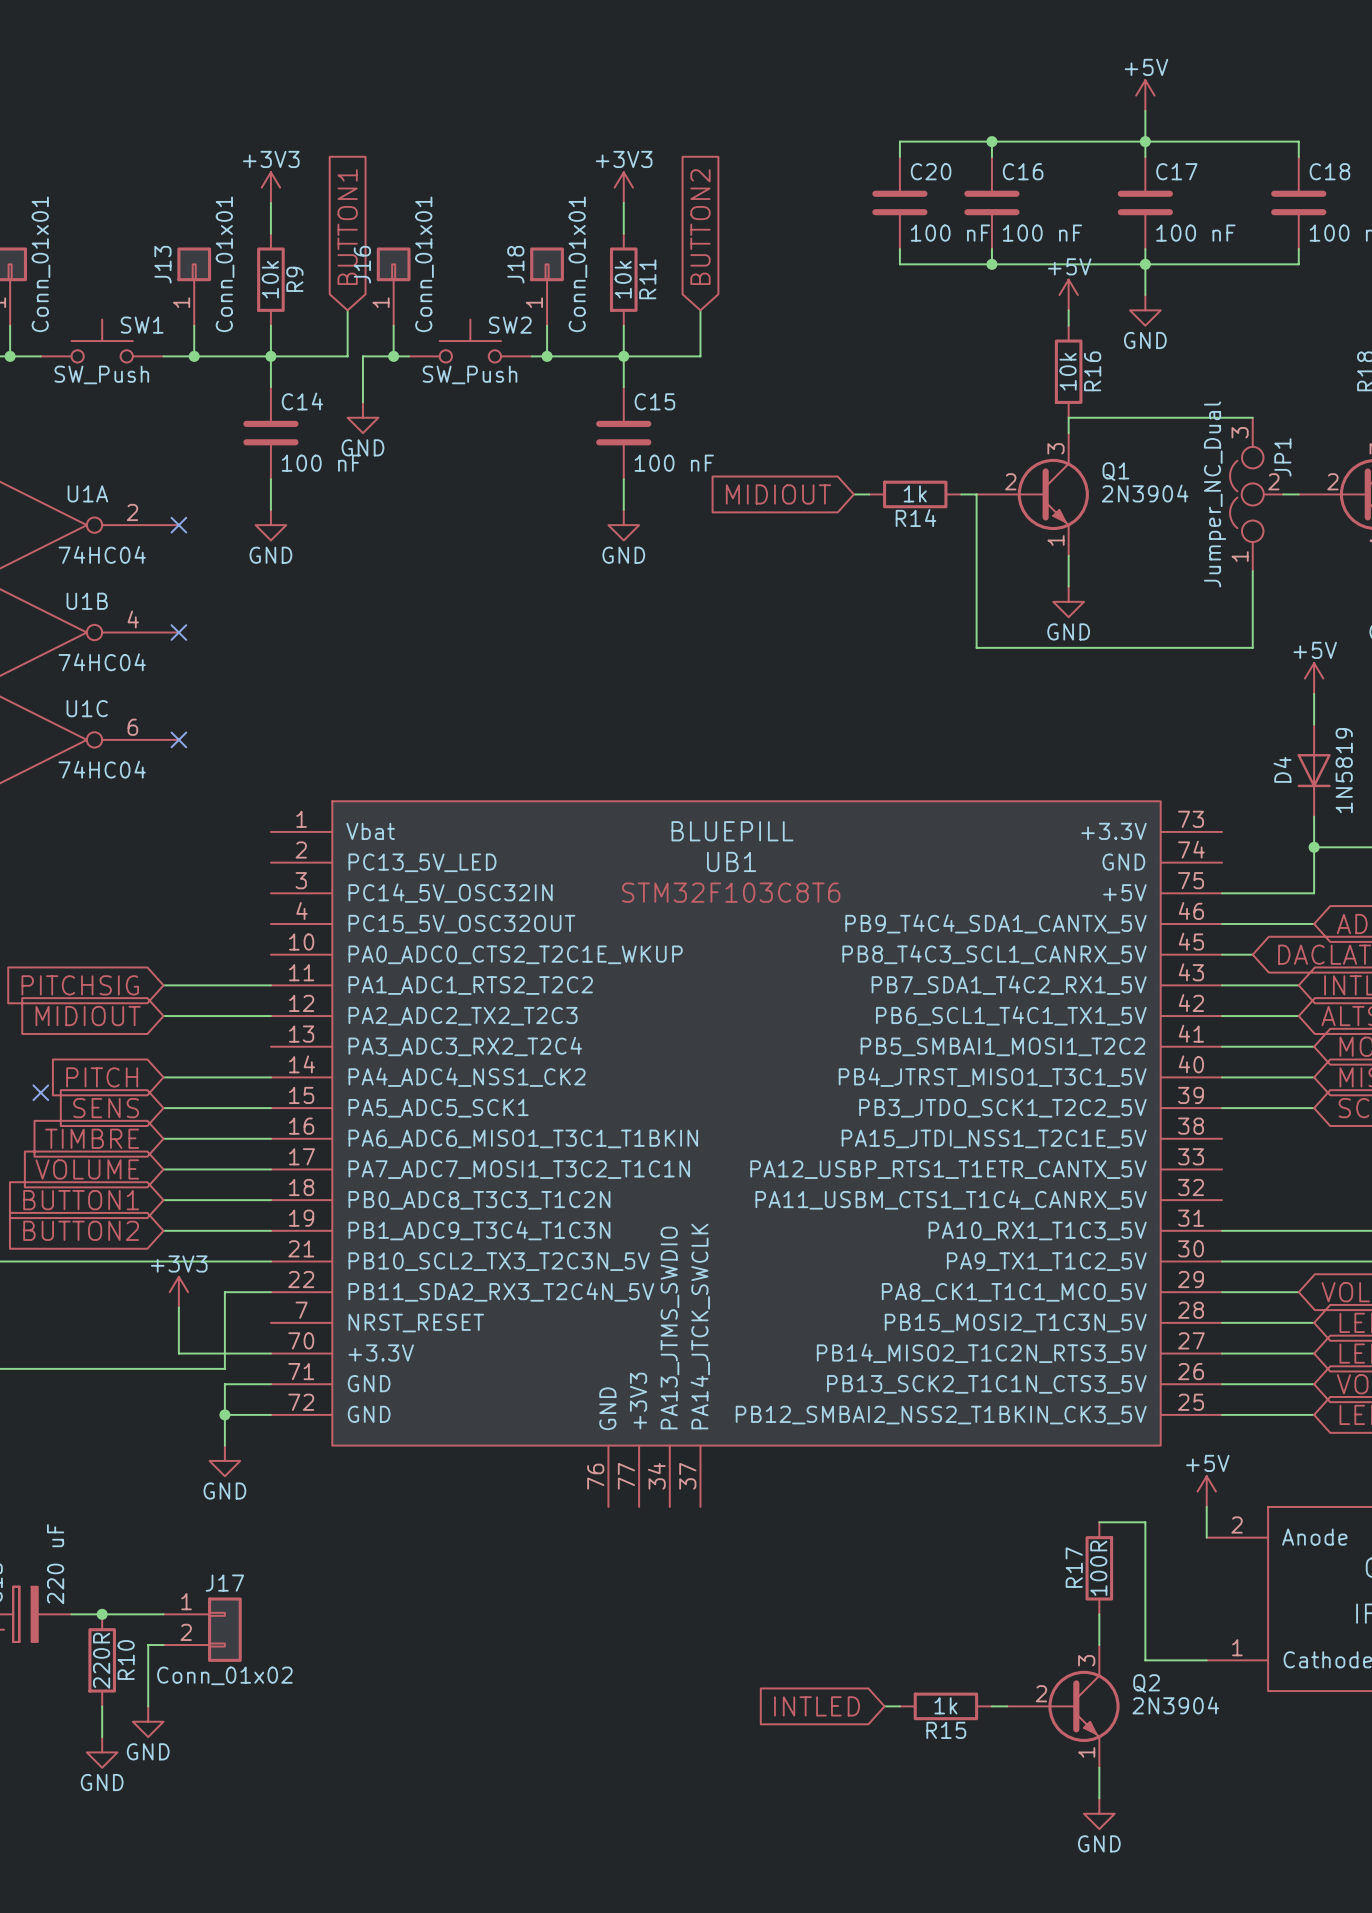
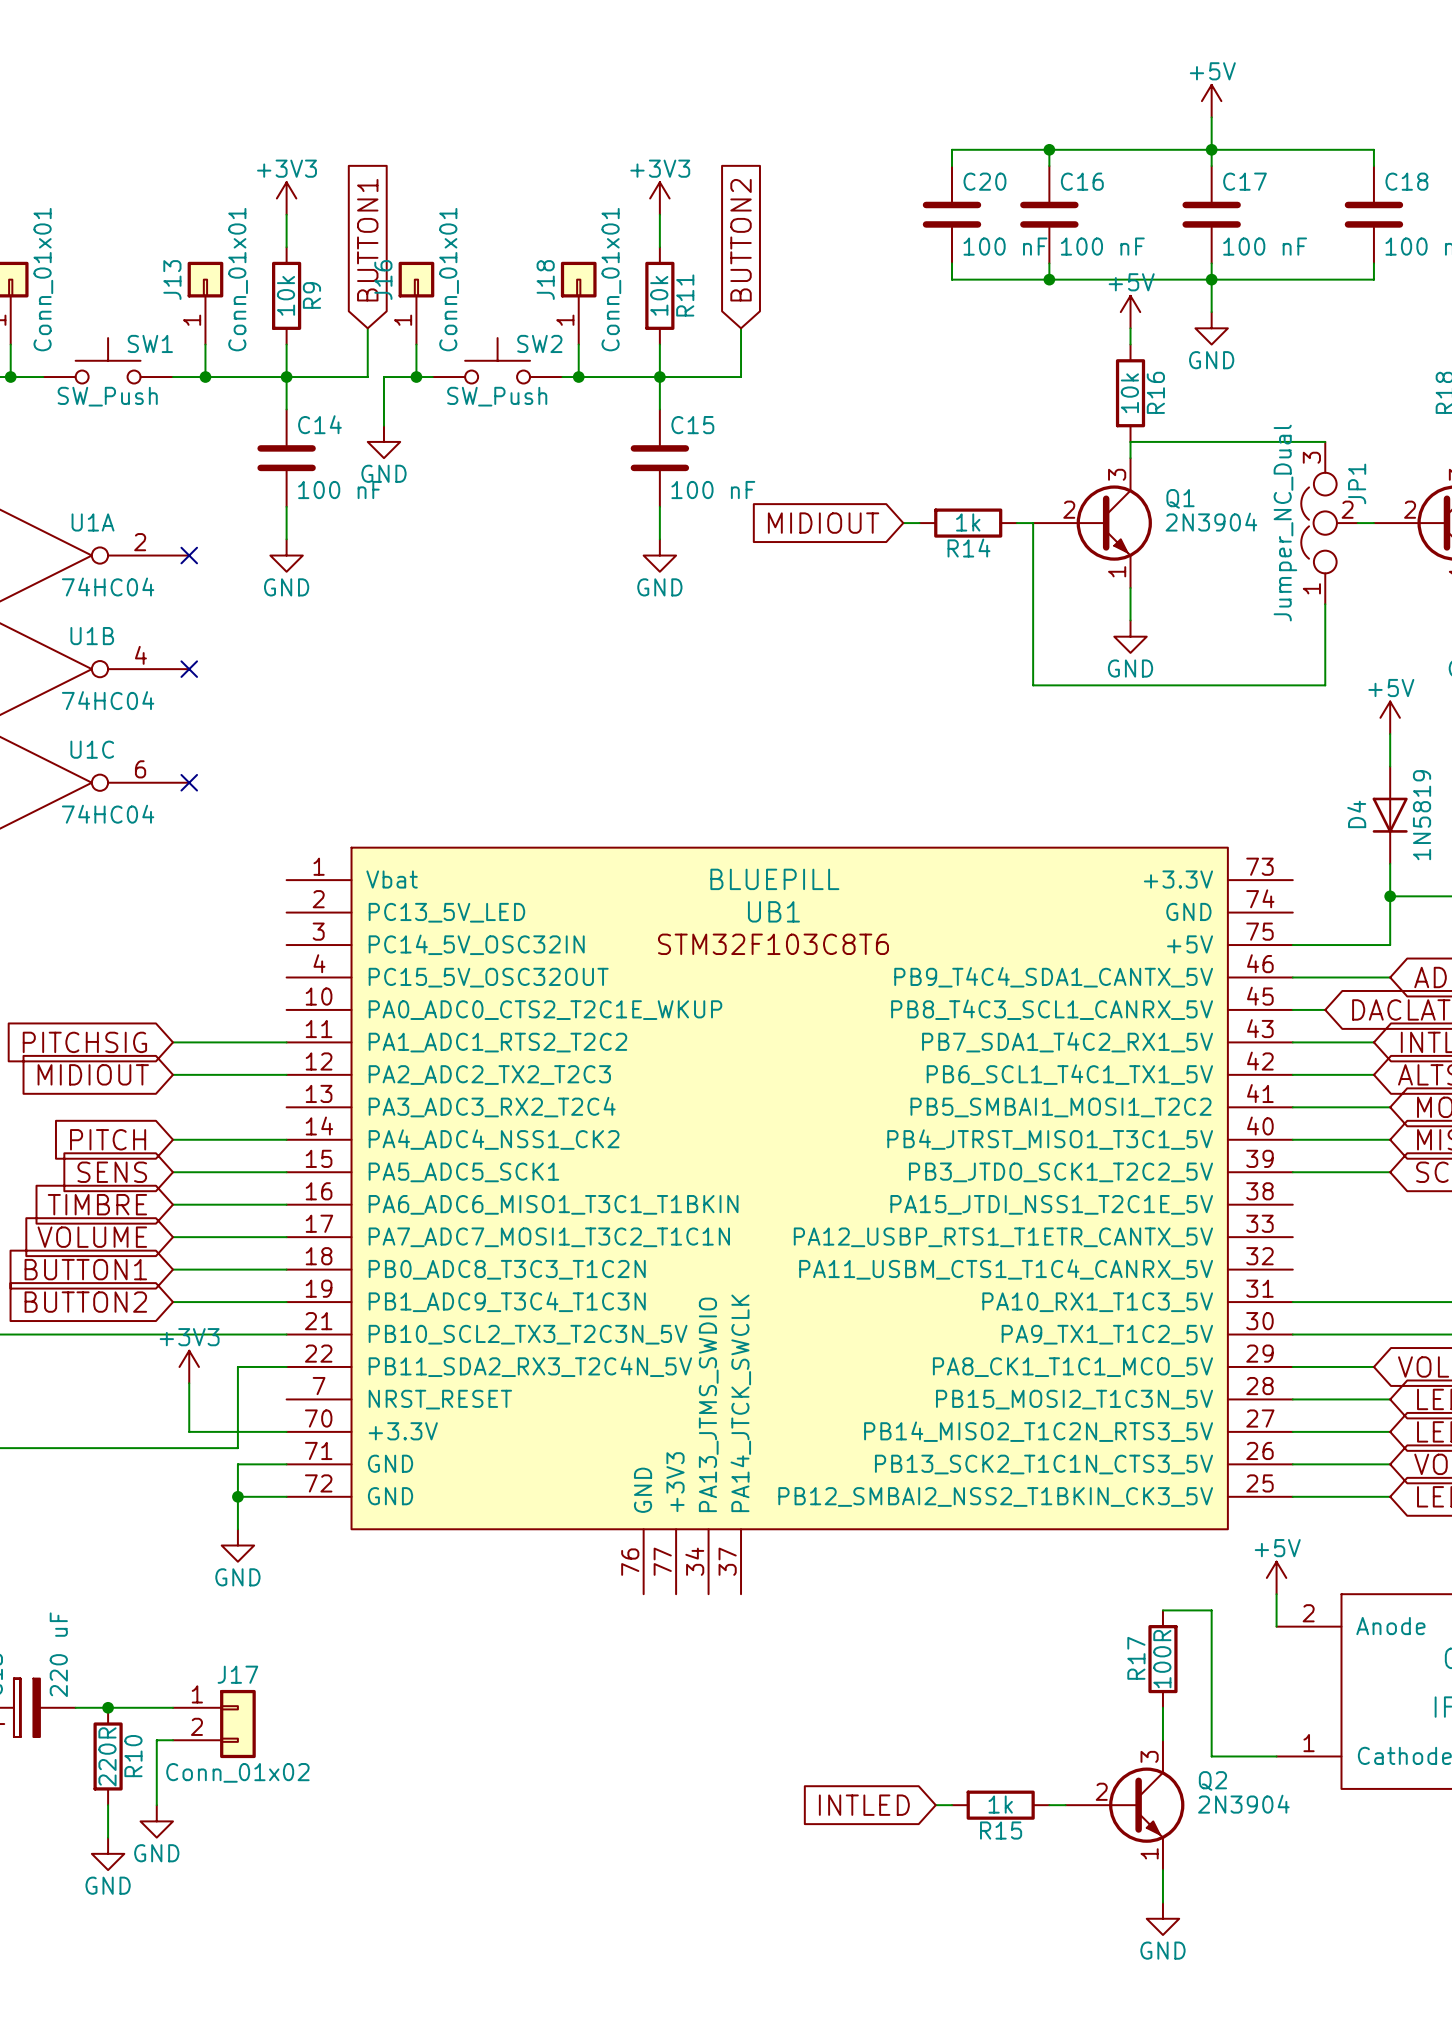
no-connect mark: (40, 1092) -> none

